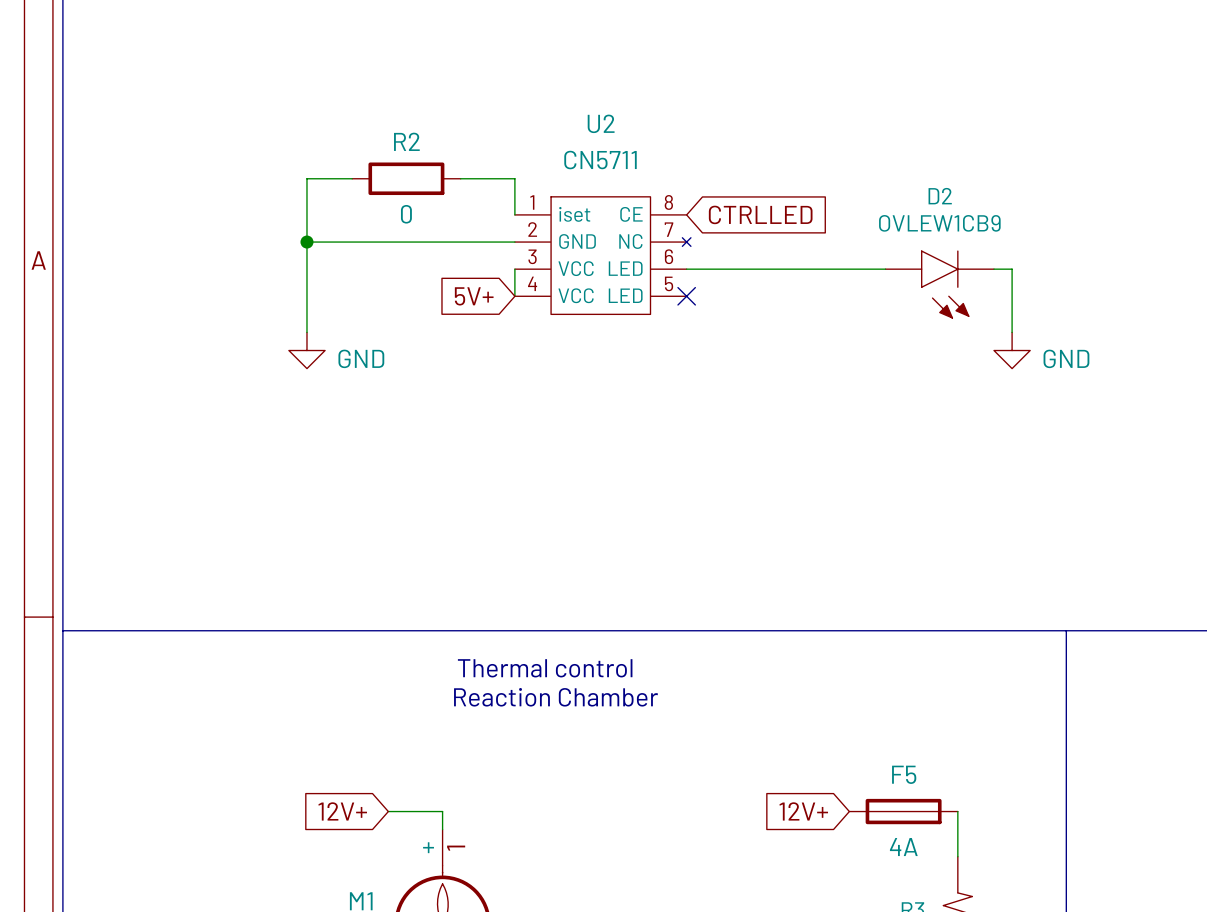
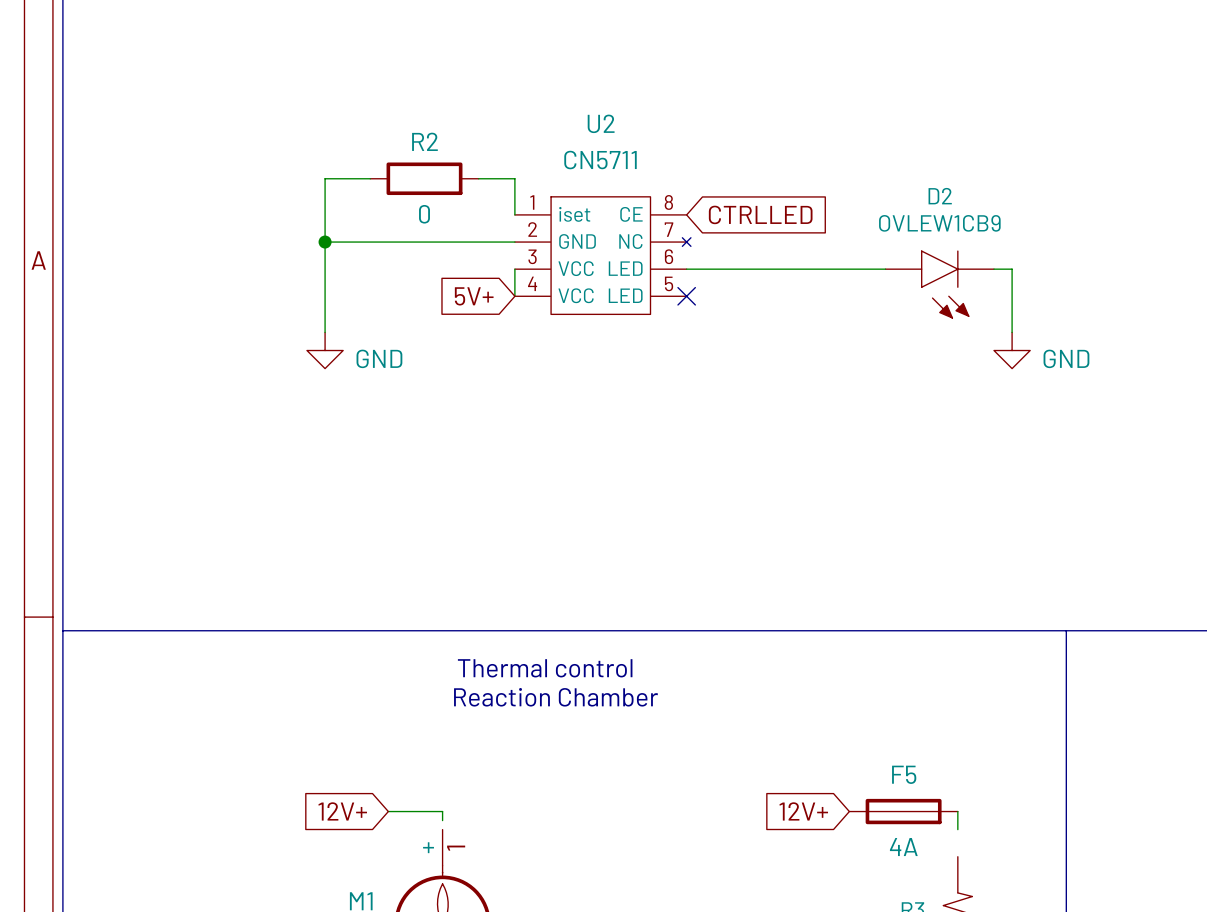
wire: (325, 178) (306, 178) (306, 332) -> (325, 178) (325, 332)
R2 position: (406, 178) -> (424, 178)
junction position: (306, 242) -> (325, 242)
power symbol position: GND (306, 350) -> GND (325, 350)
wire: (442, 820) (442, 829) -> none
wire: (957, 829) (957, 856) -> none

